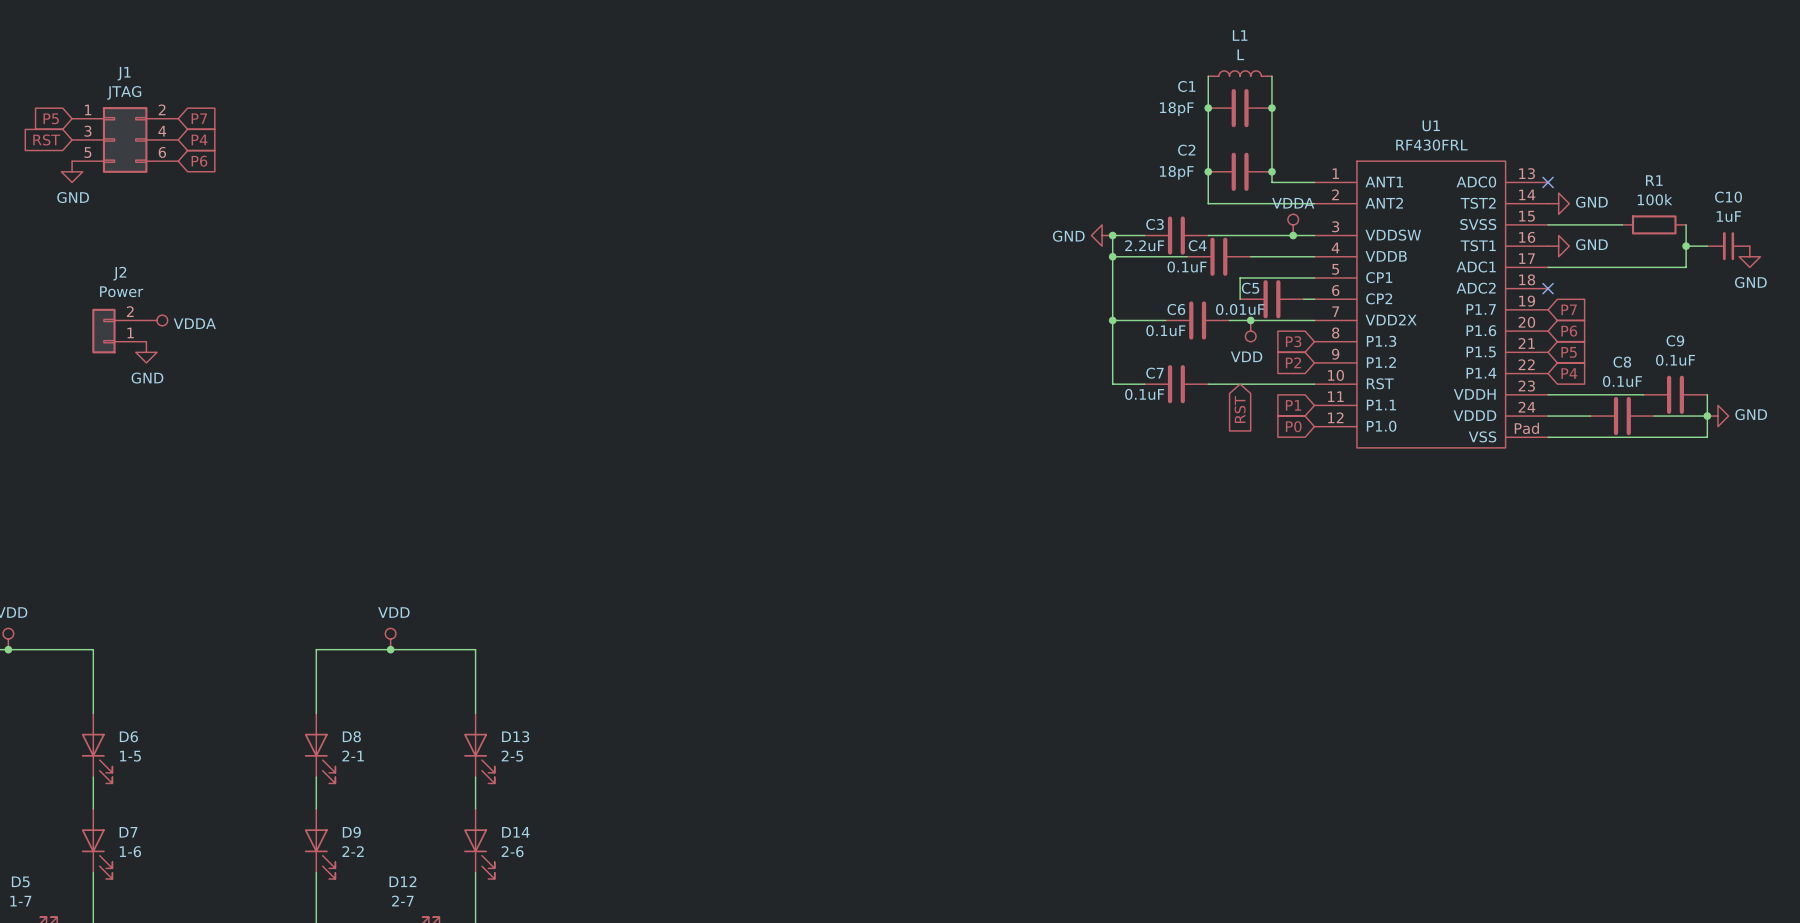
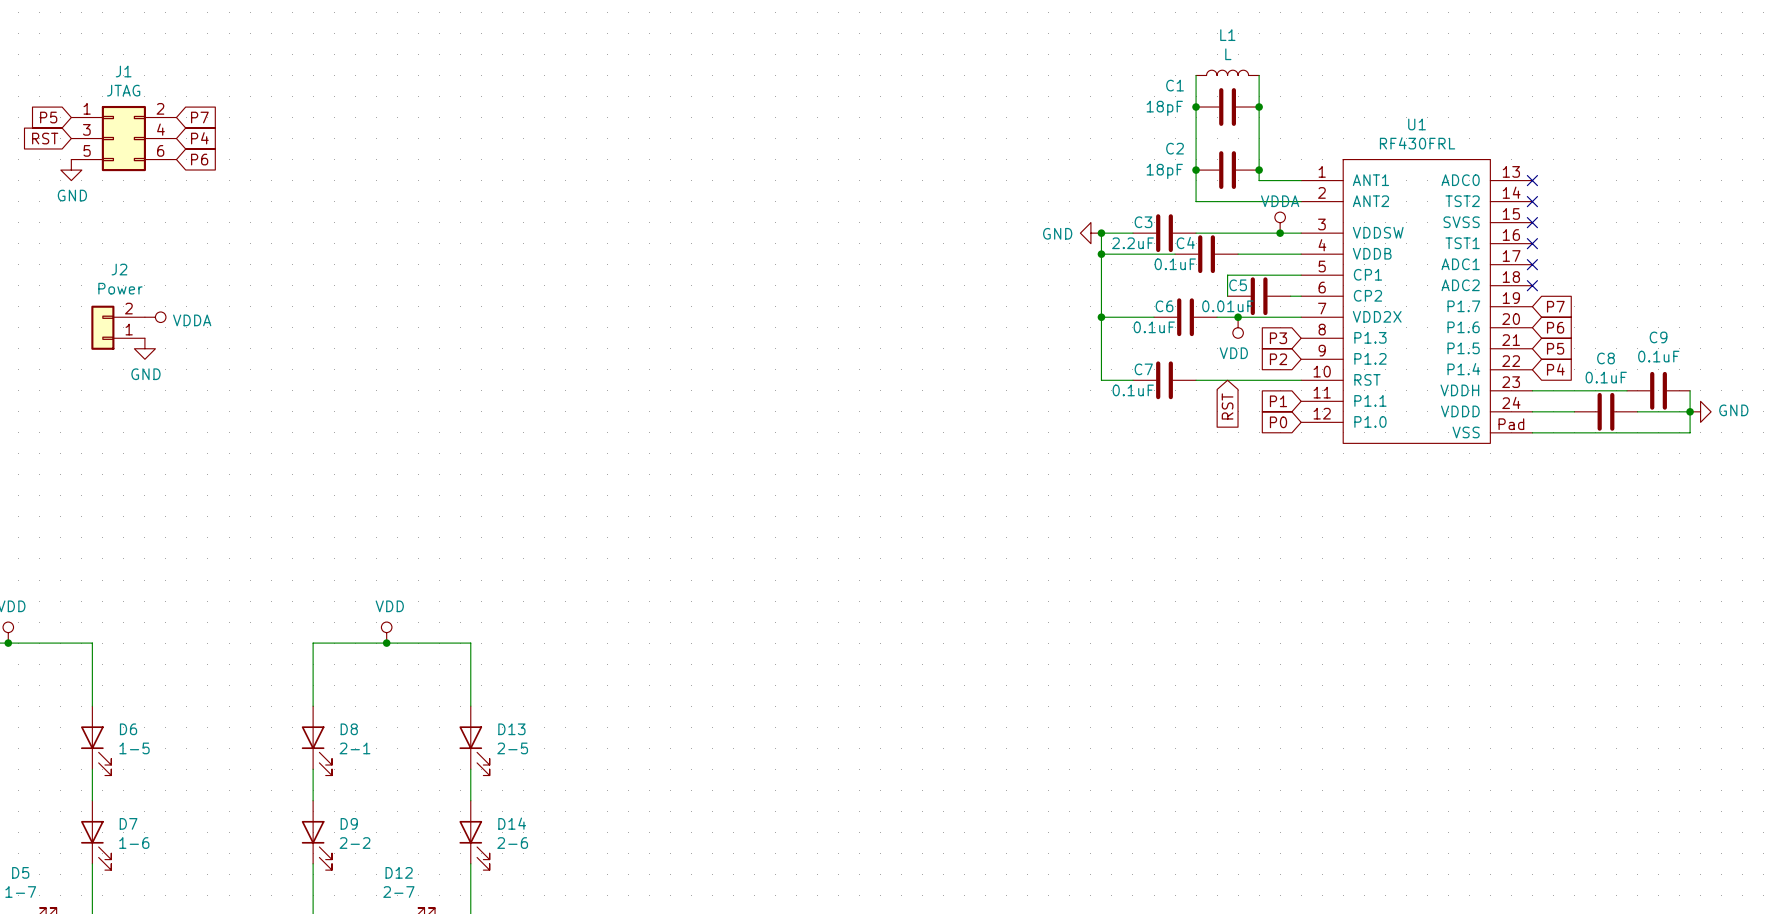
no-connect mark: none -> (1532, 201)
power symbol: GND (1558, 203) -> none
wire: (1548, 224) (1622, 224) -> none
no-connect mark: none -> (1532, 222)
R1: 100k (1654, 224) -> none
wire: (1686, 224) (1686, 267) (1548, 267) -> none
no-connect mark: none -> (1532, 243)
power symbol: GND (1558, 246) -> none
wire: (1686, 246) (1707, 246) -> none
junction: (1686, 246) -> none
C10: 1uF (1728, 246) -> none
power symbol: GND (1749, 256) -> none
no-connect mark: none -> (1532, 264)

